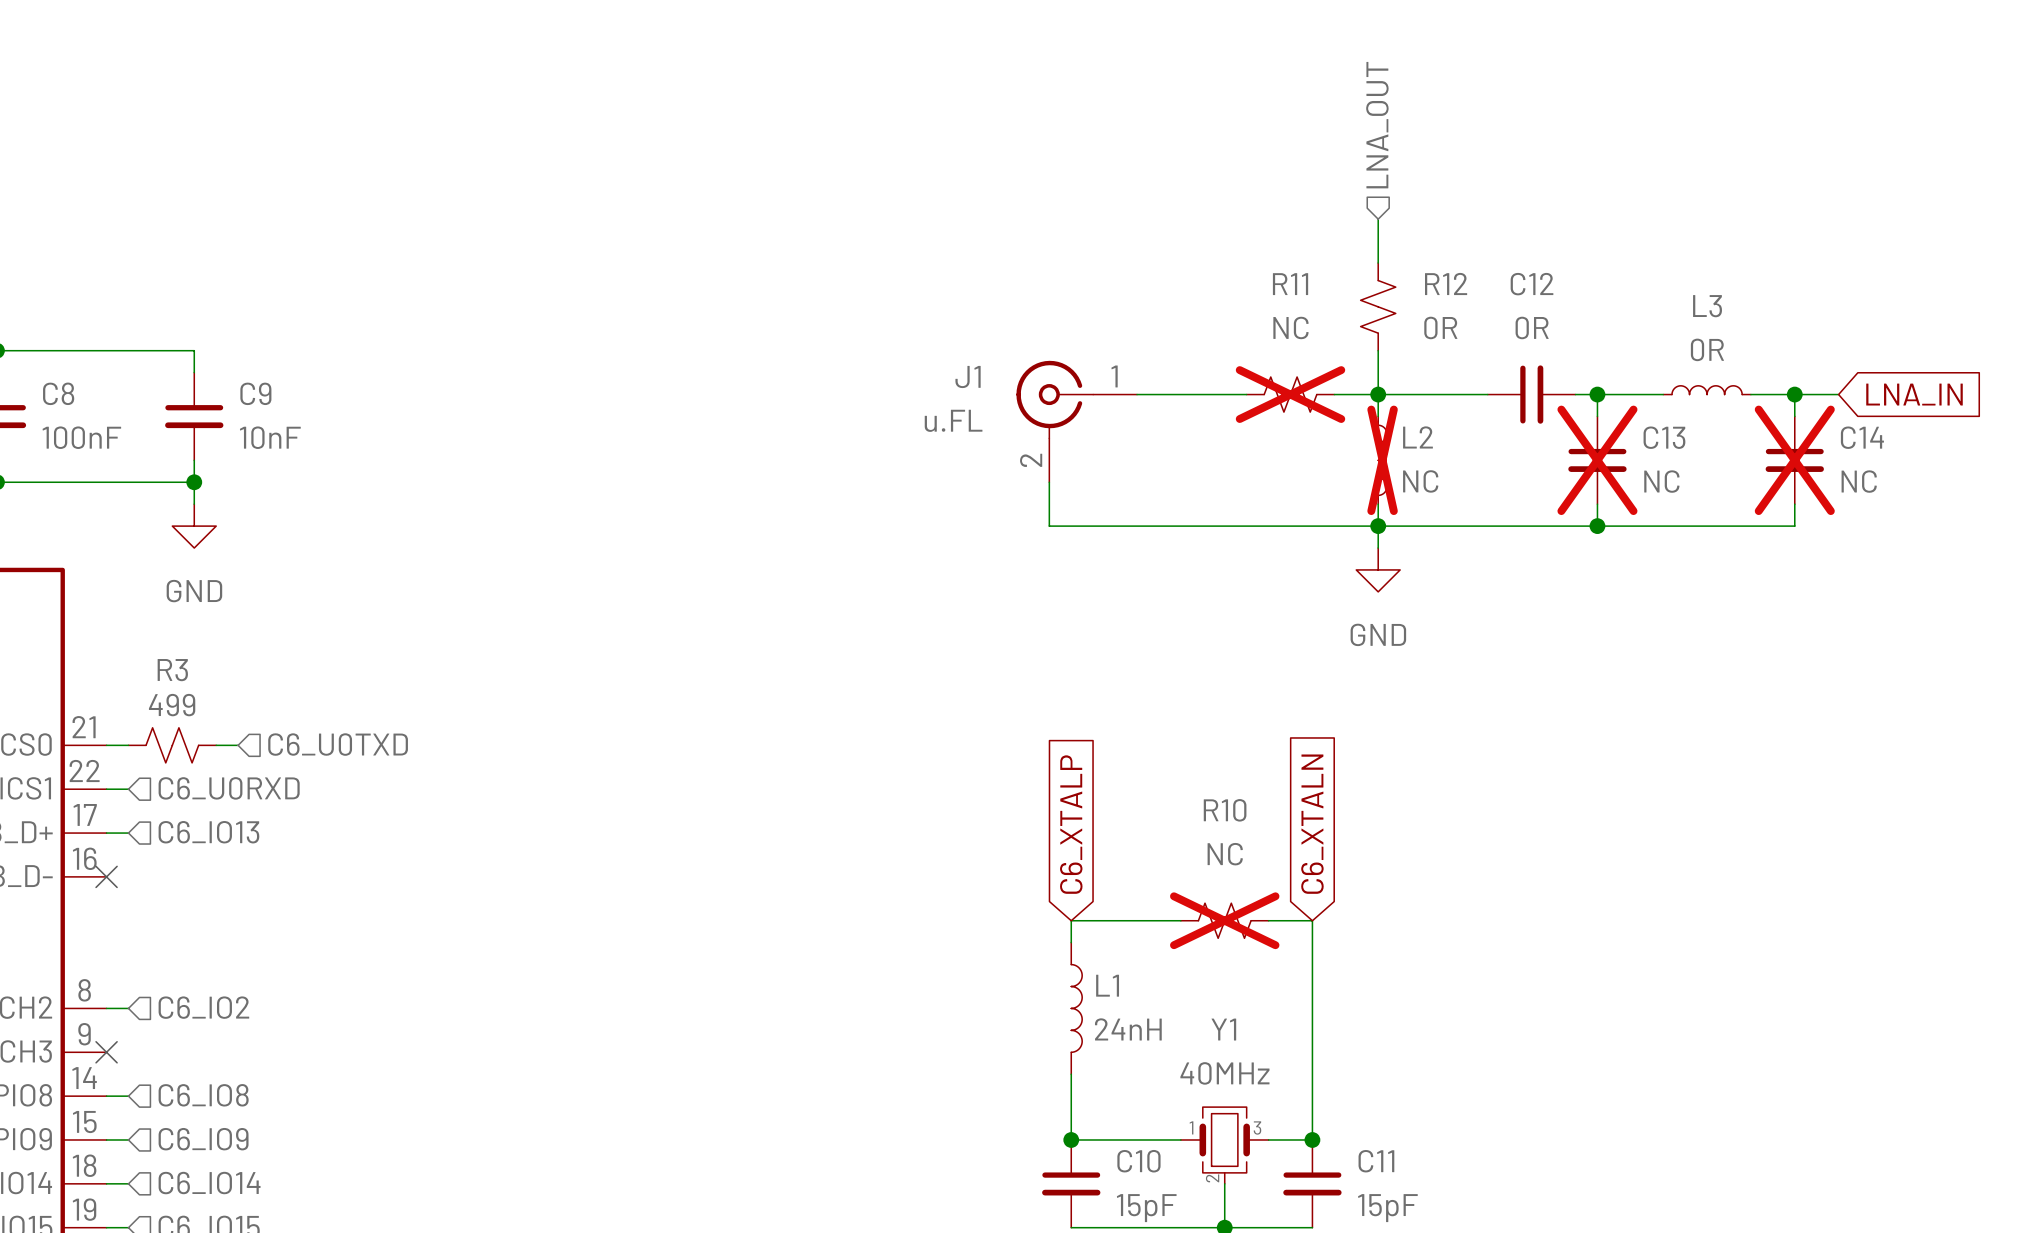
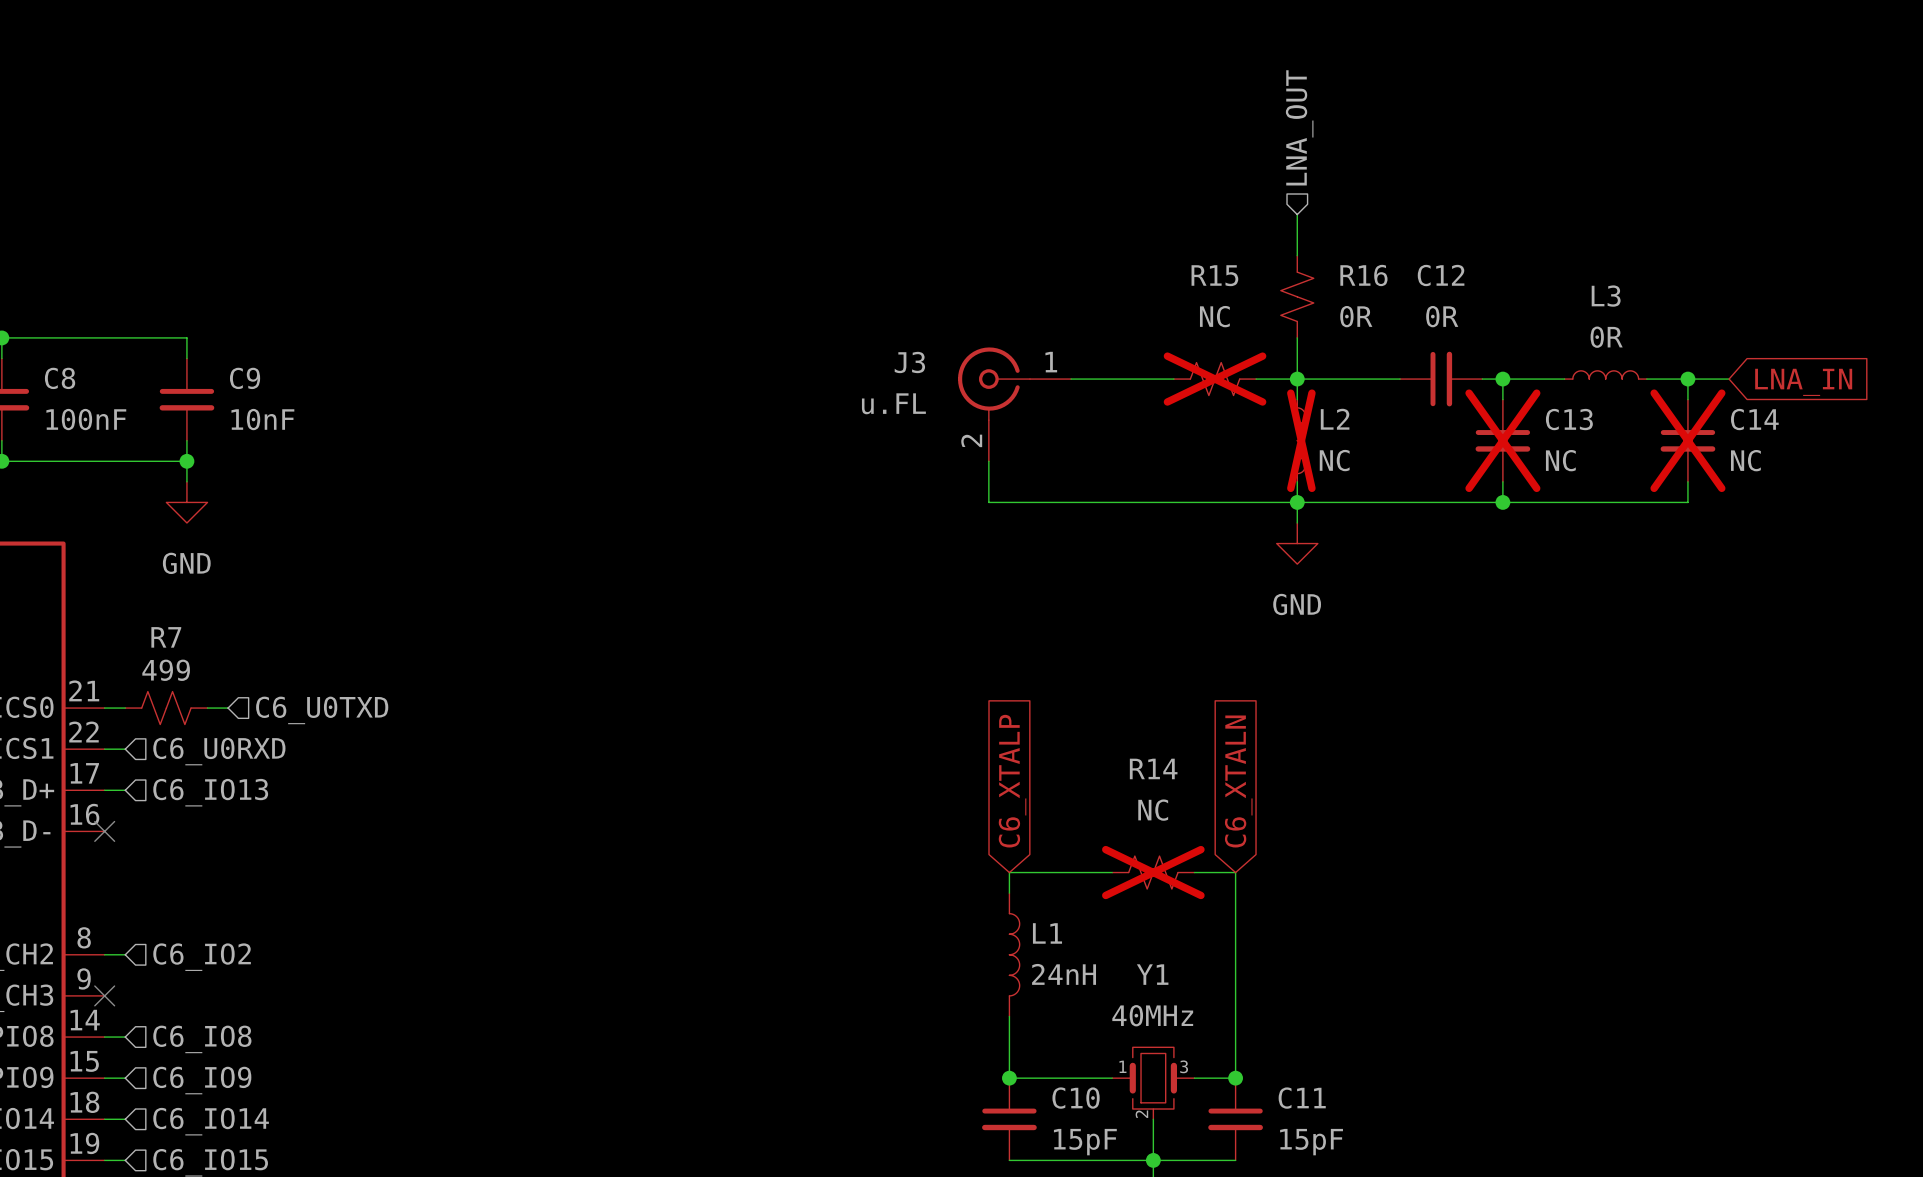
R12 name: R12 (1446, 283) -> R16 (1363, 275)
R11 name: R11 (1290, 284) -> R15 (1214, 275)
J1 name: J1 (968, 376) -> J3 (909, 362)
R3 name: R3 (172, 670) -> R7 (166, 637)
R10 name: R10 (1225, 810) -> R14 (1153, 768)

